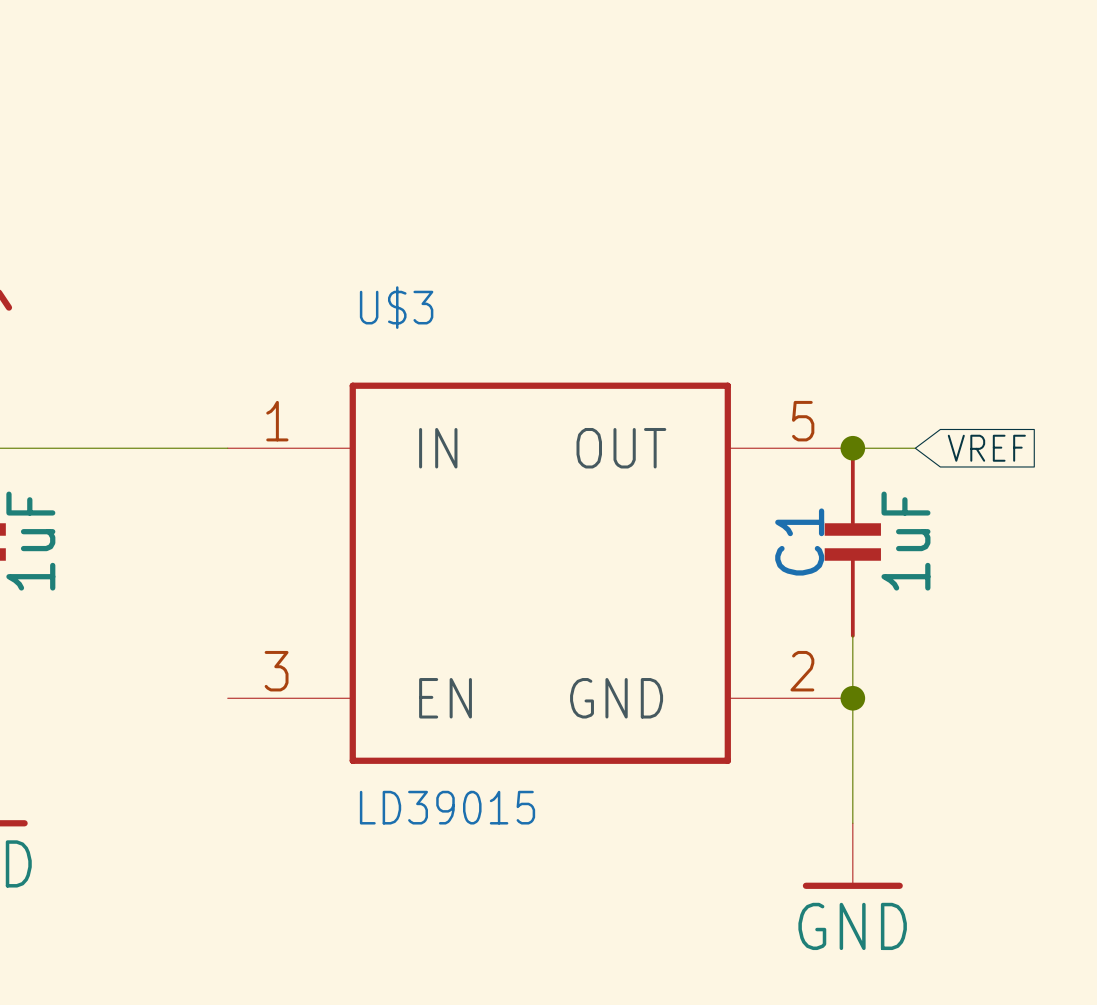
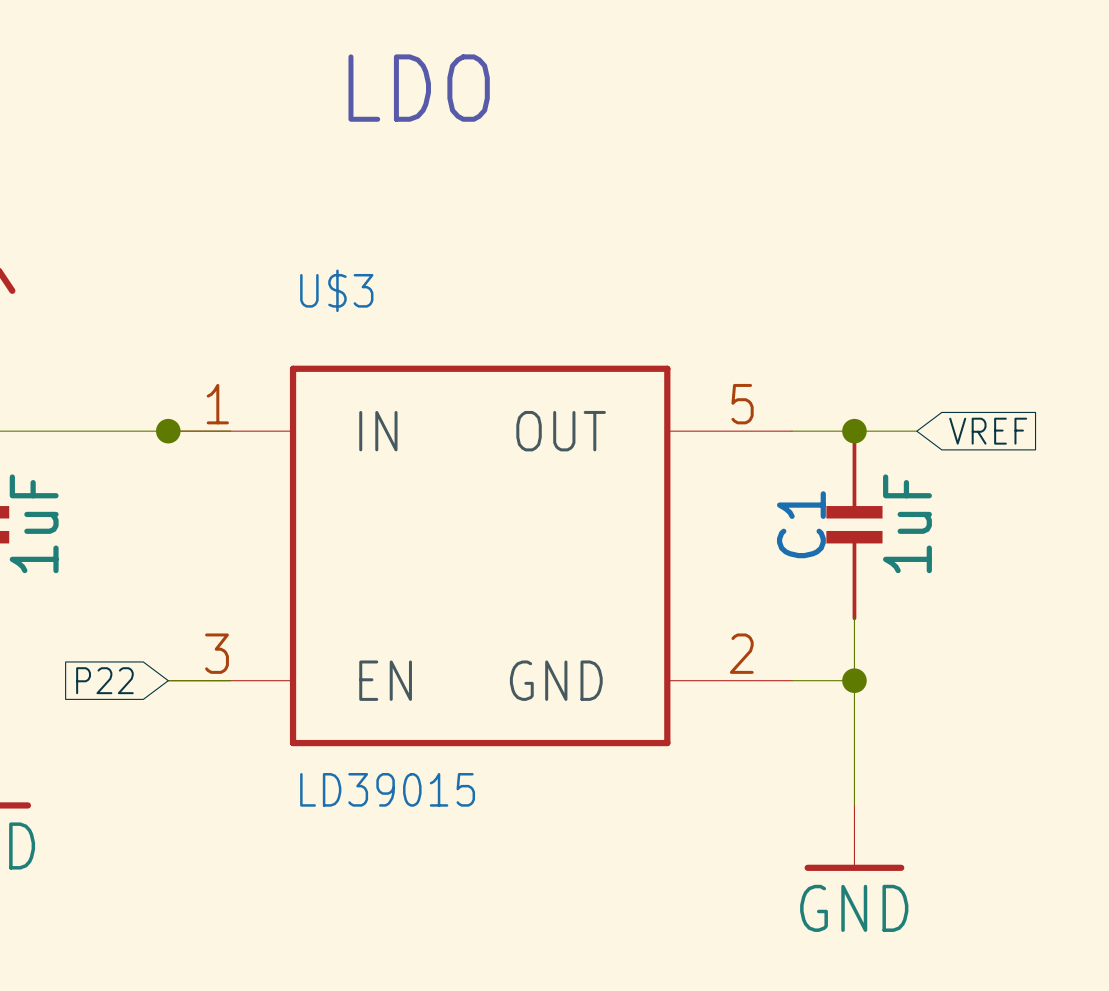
text: none -> LDO (419, 88)
junction: none -> (168, 431)
U$3 position: (540, 573) -> (480, 555)
global label: none -> P22 (104, 680)
wire: none -> (168, 680) (230, 680)

